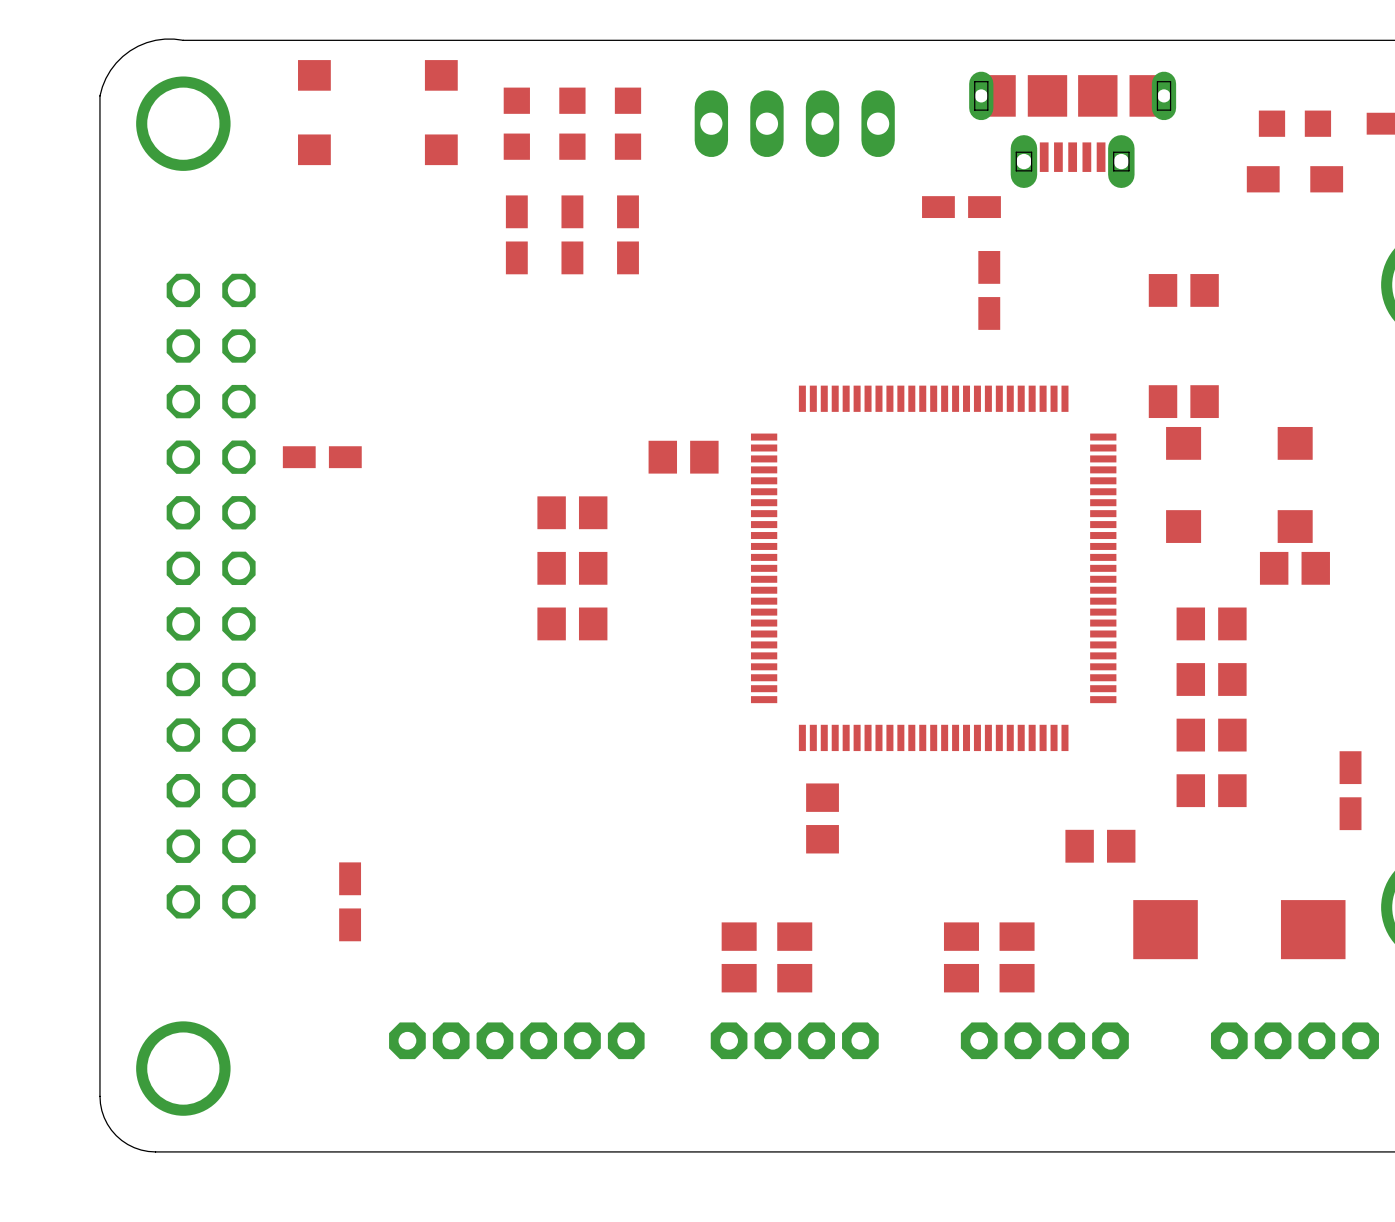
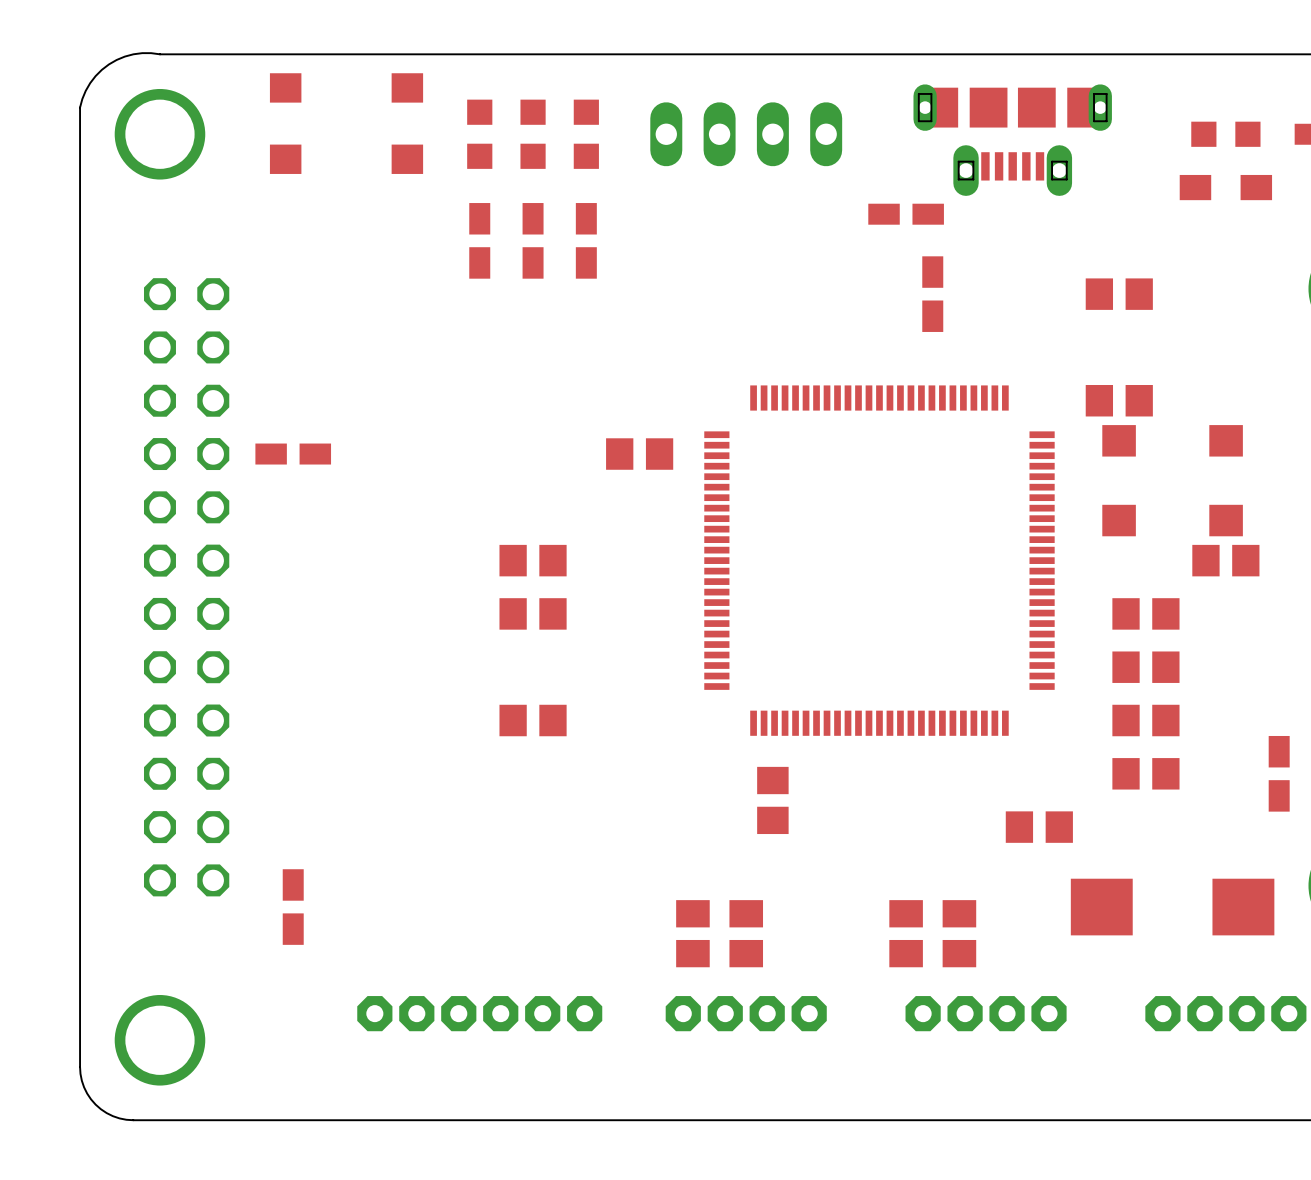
part position: (572, 512) -> (533, 720)
part position: (350, 901) -> (293, 907)

